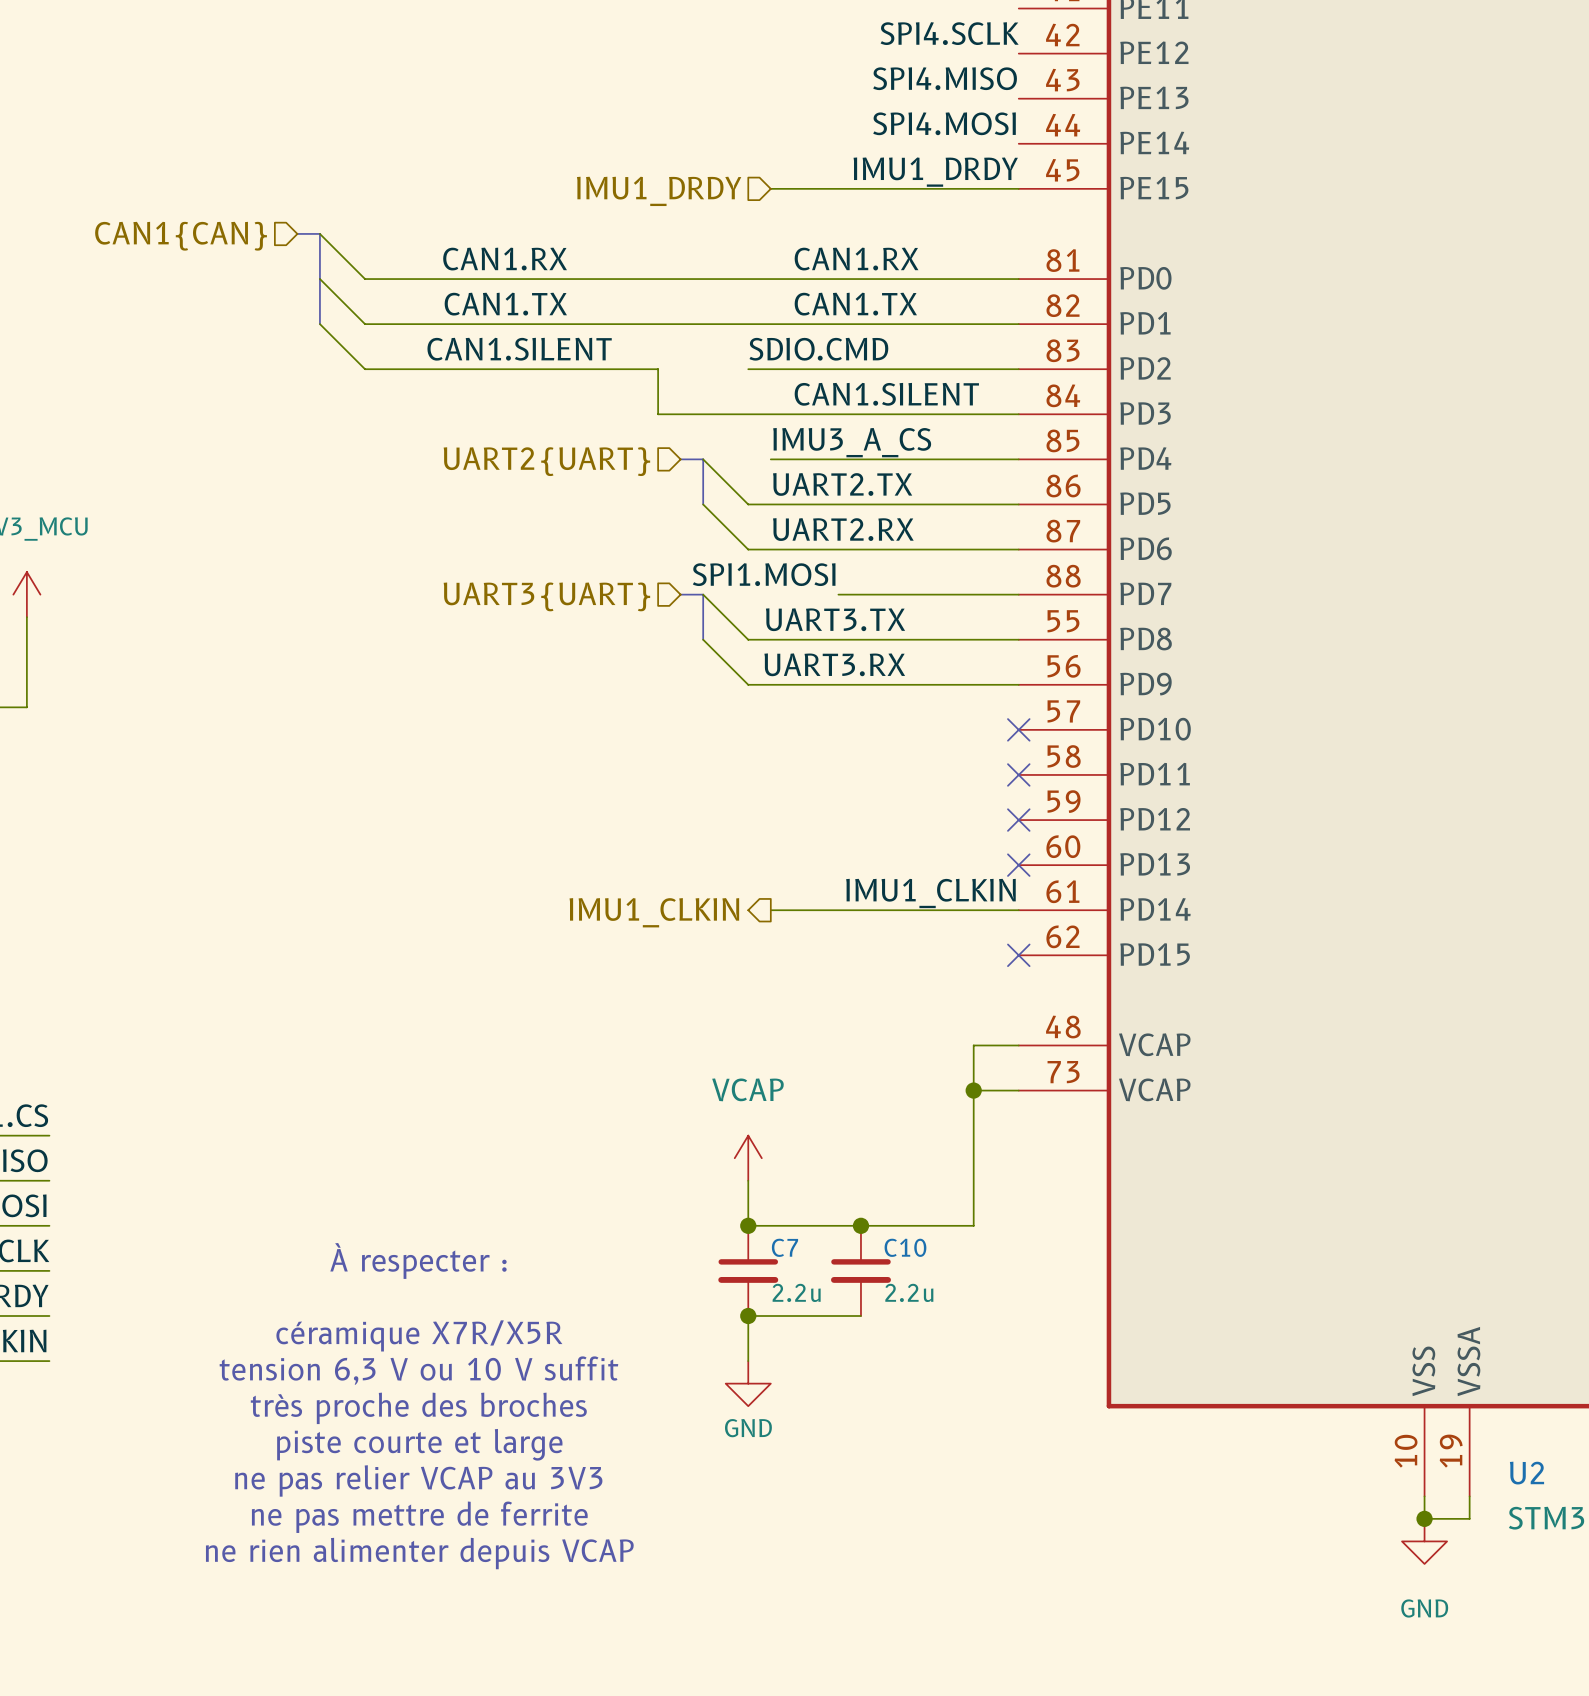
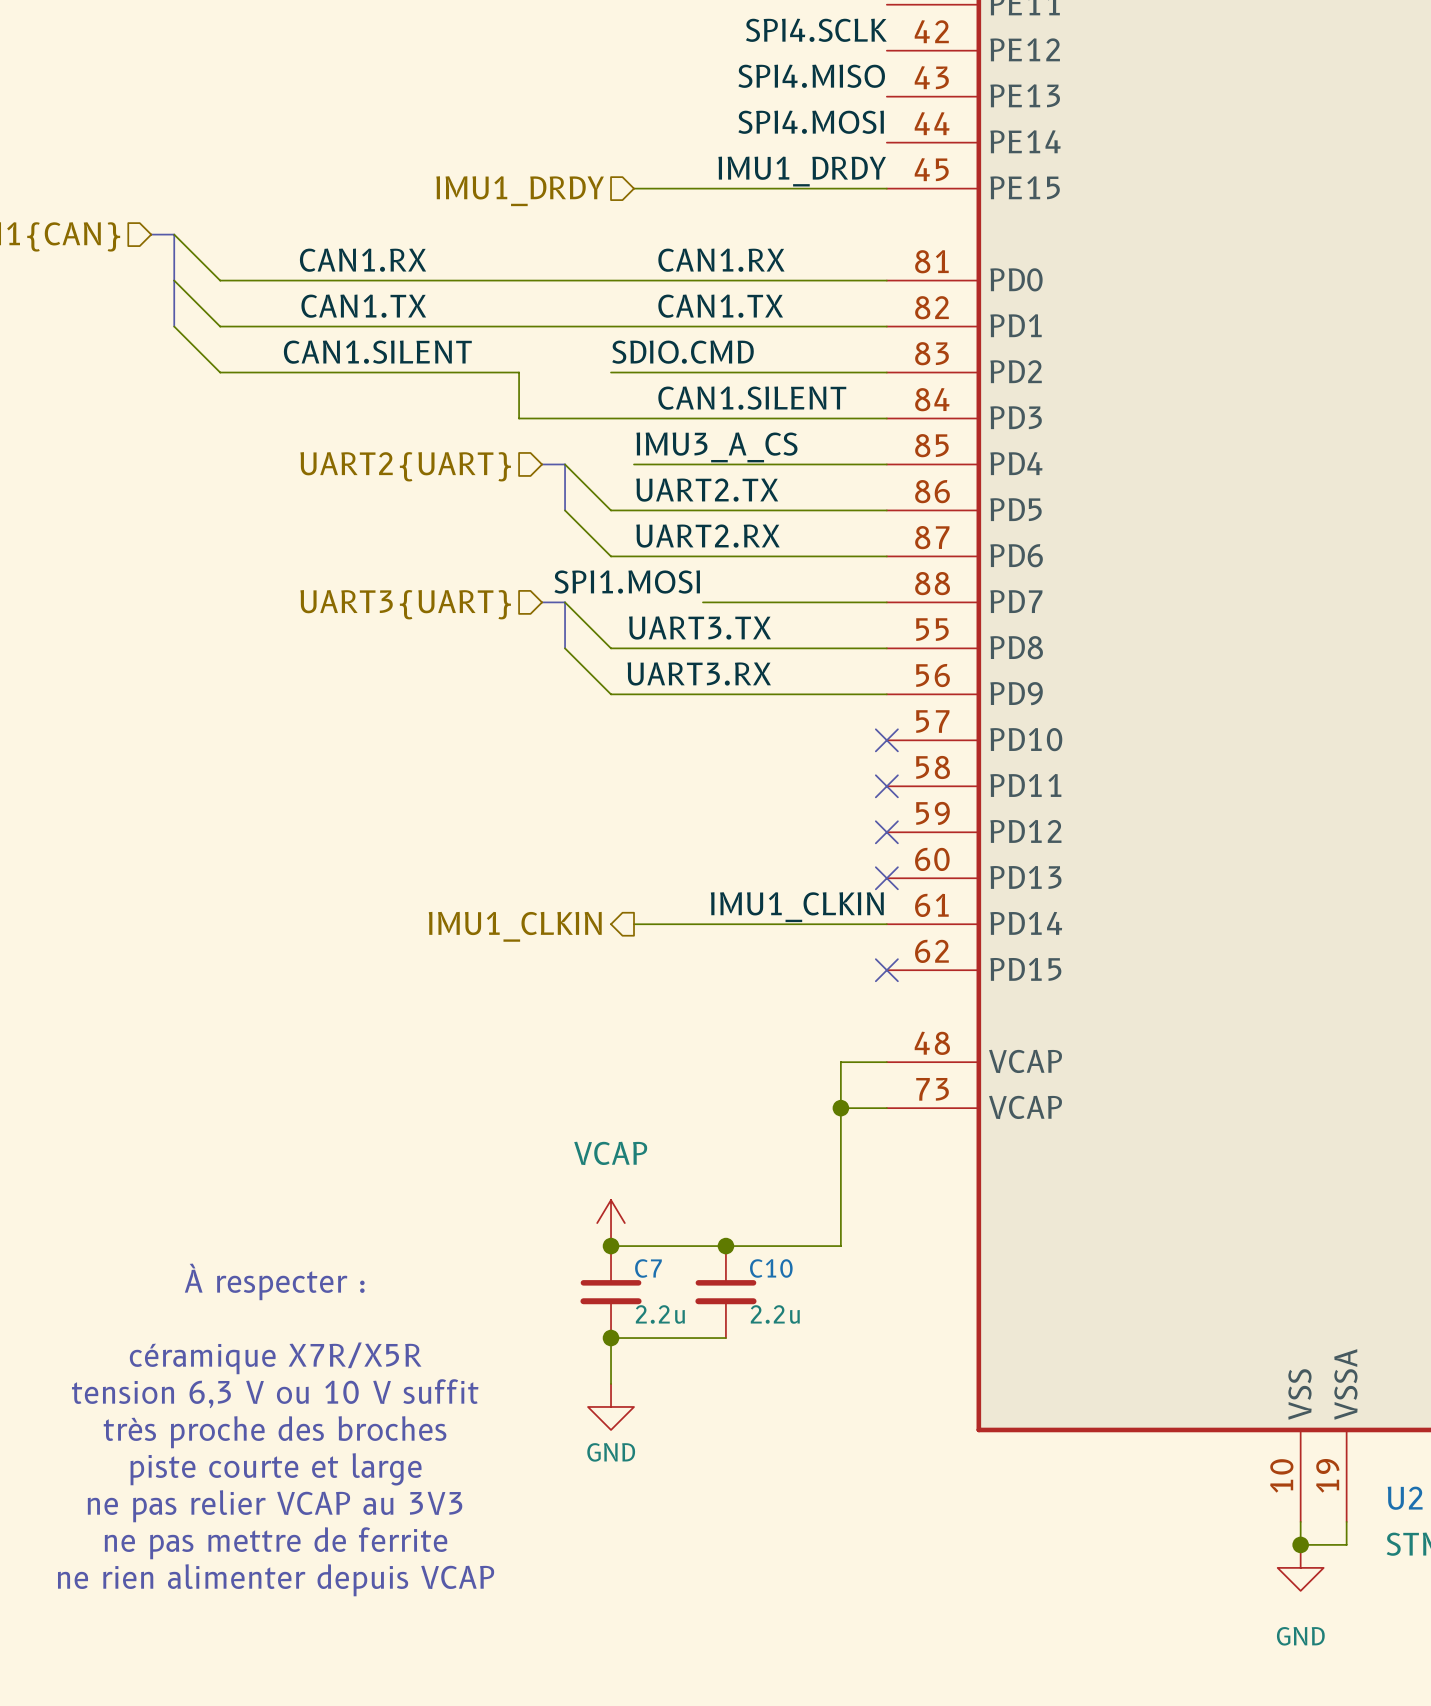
power symbol position: VCAP (748, 1158) -> VCAP (611, 1223)

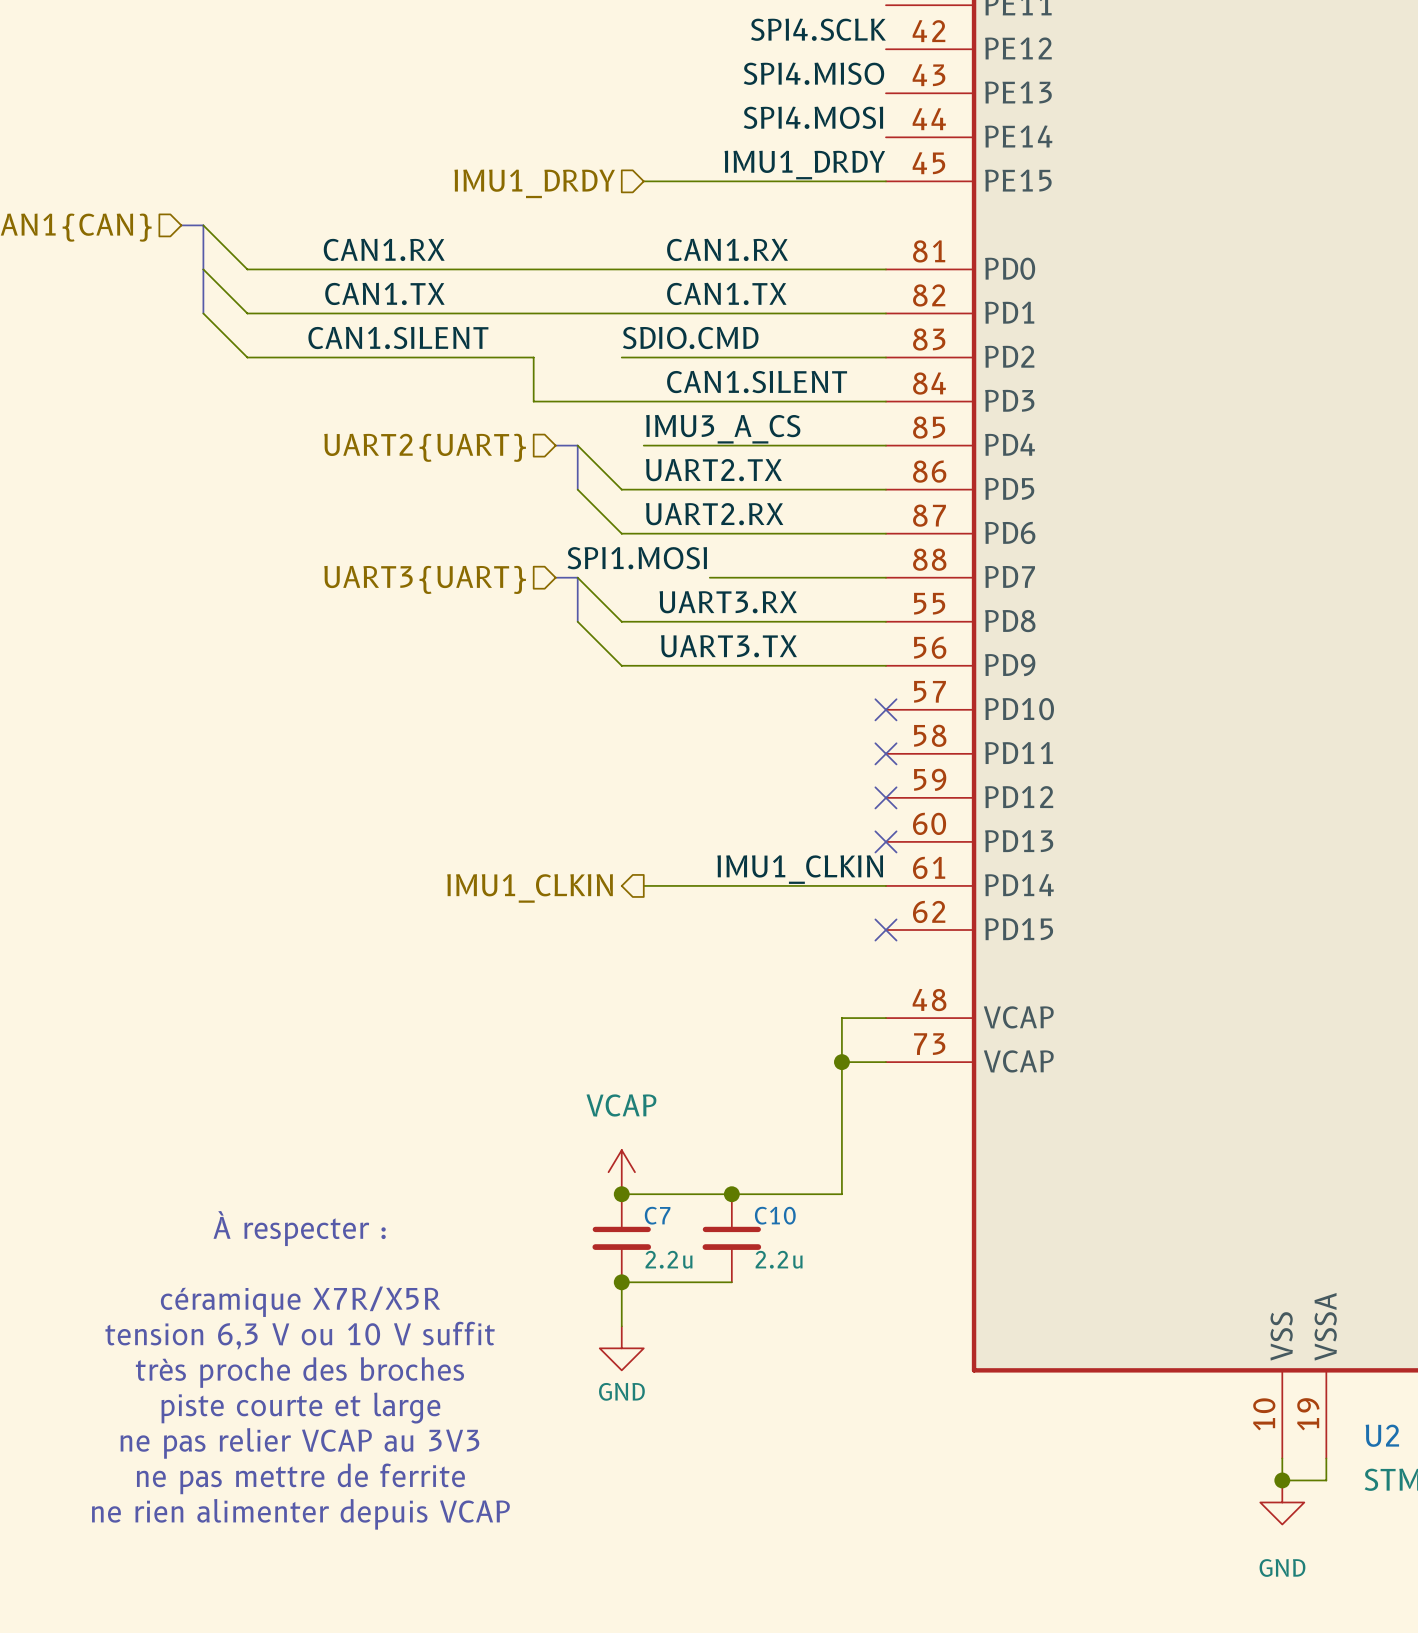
label position: UART3.TX (699, 627) -> UART3.TX (728, 646)
label position: UART3.RX (699, 673) -> UART3.RX (728, 602)

